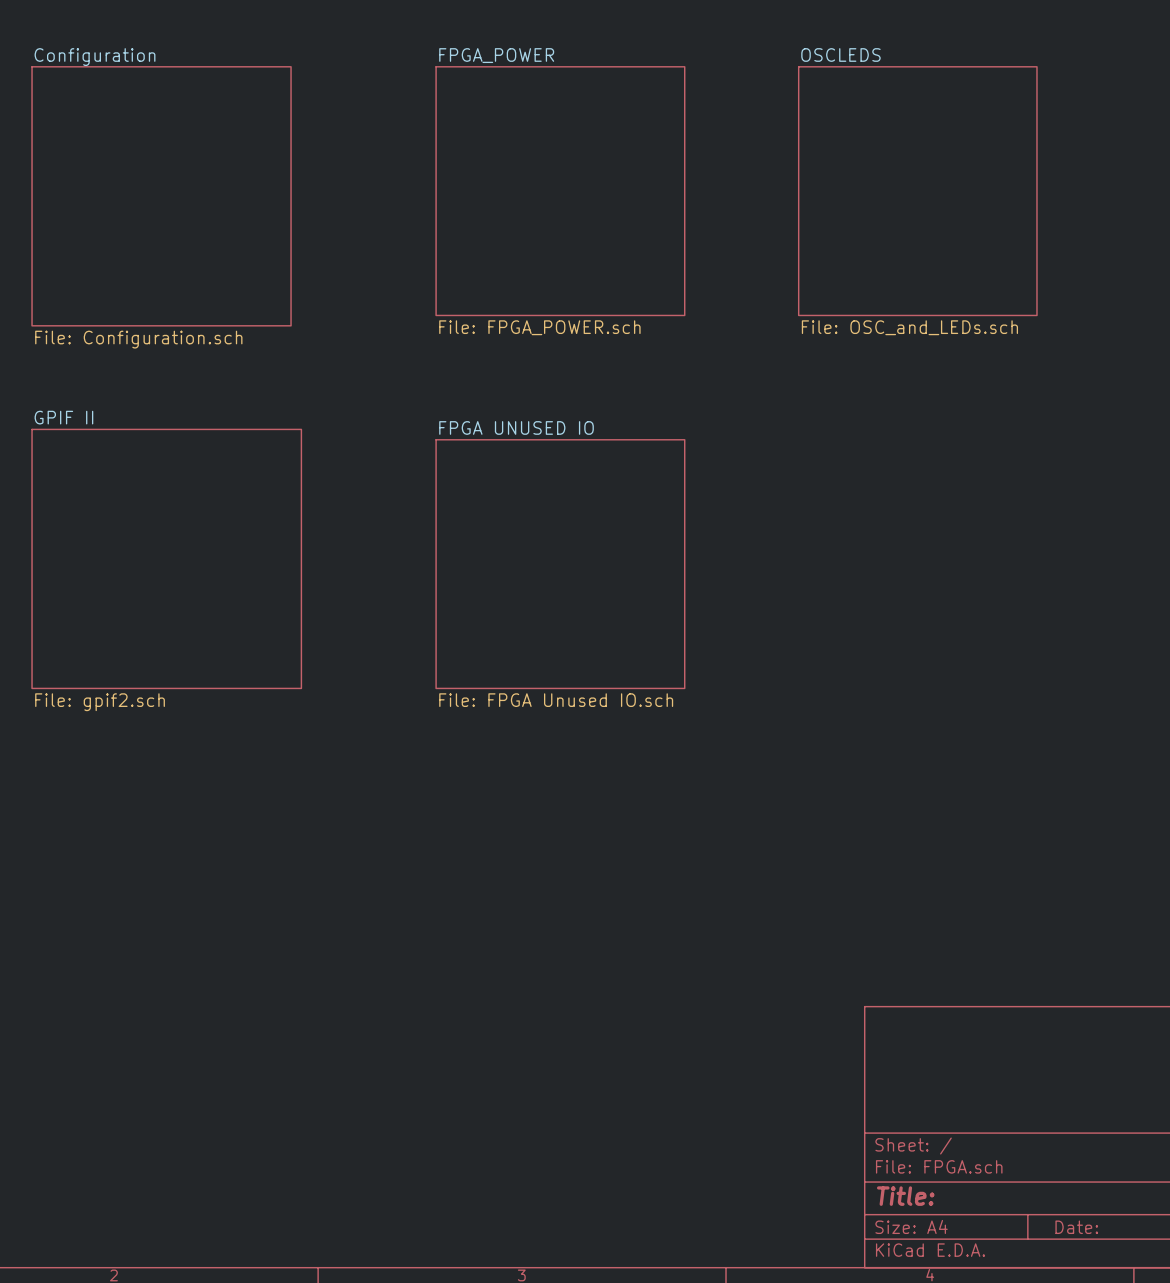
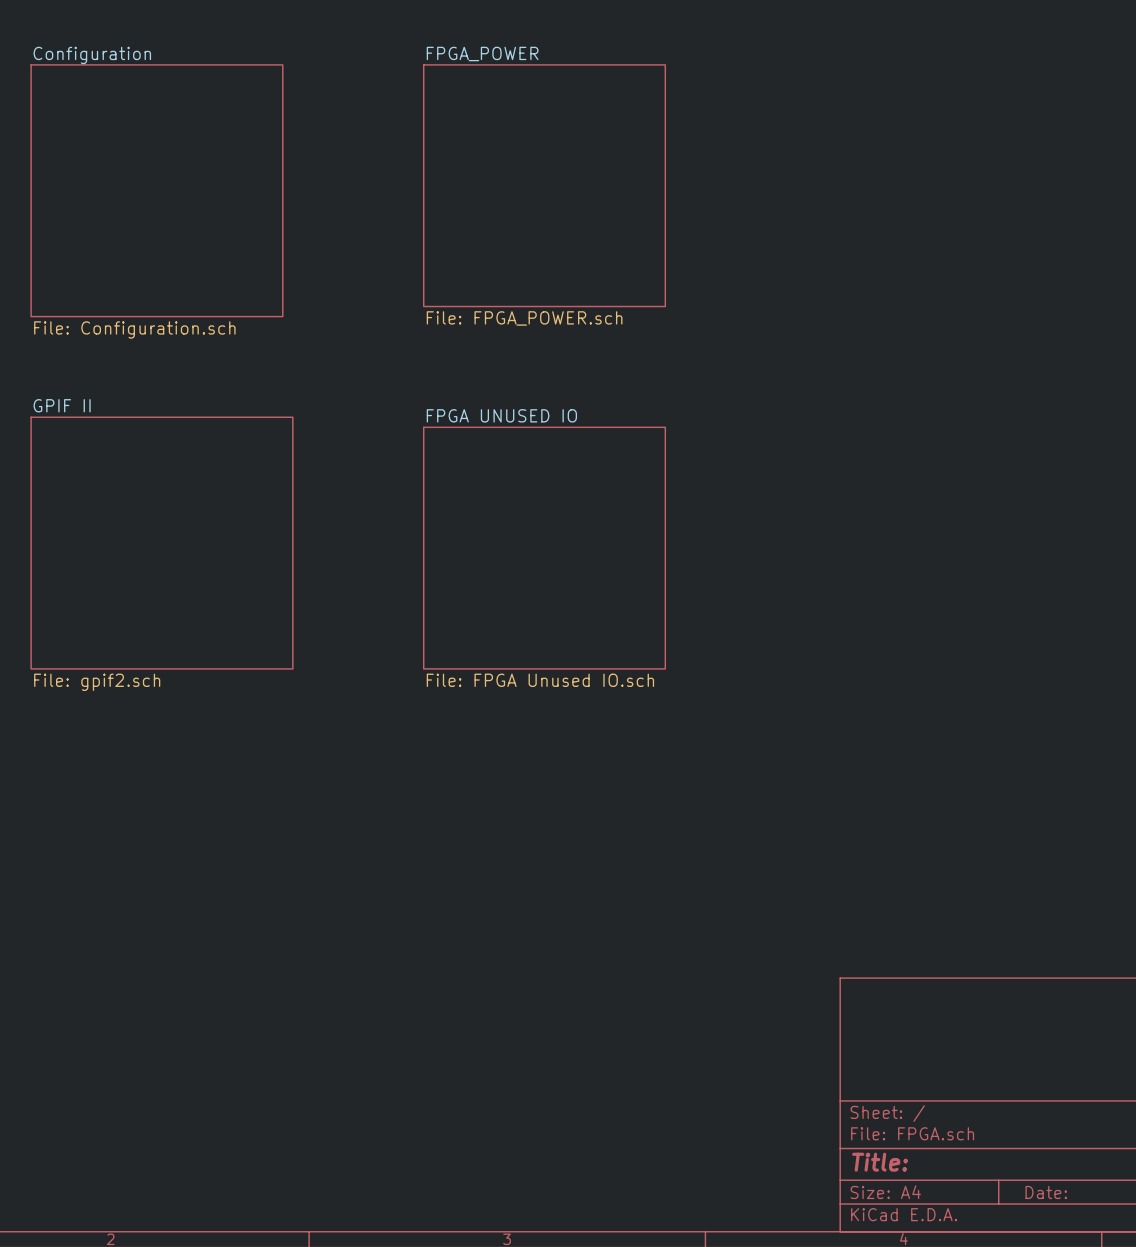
sheet OSCLEDS: File: OSC_and_LEDs.sch (917, 191) -> none

